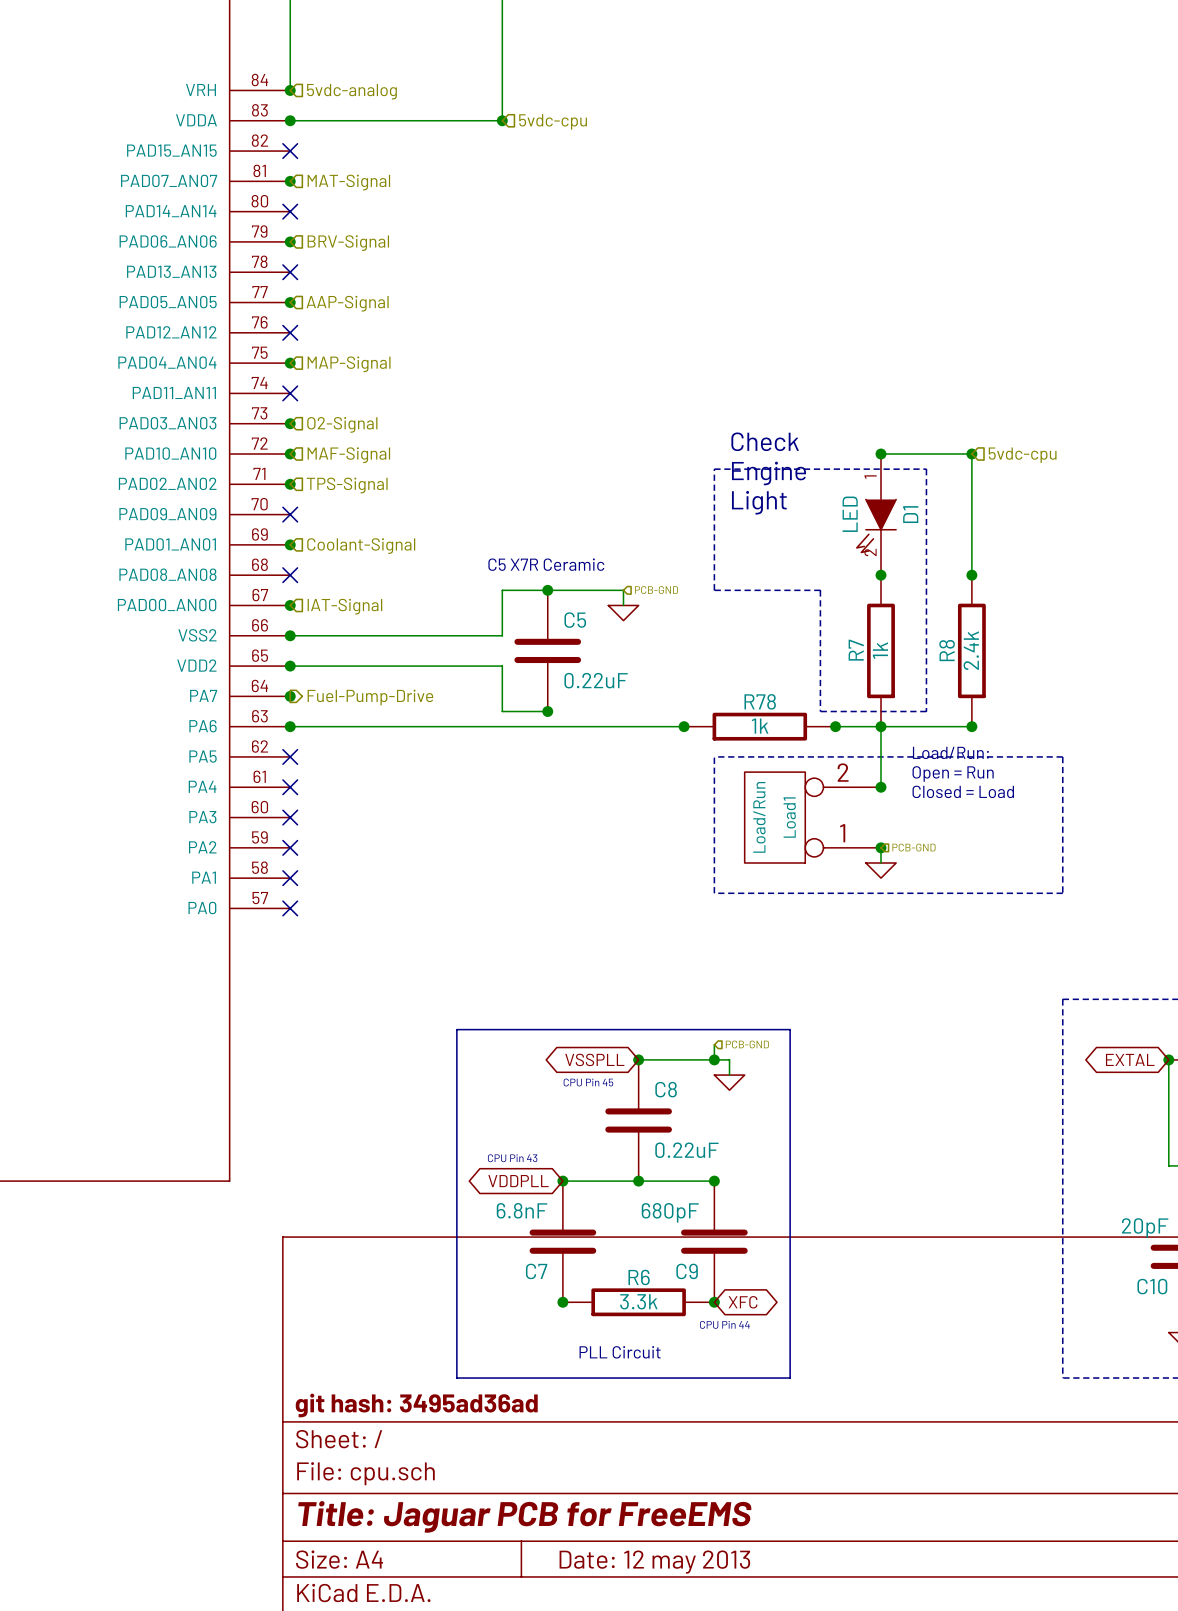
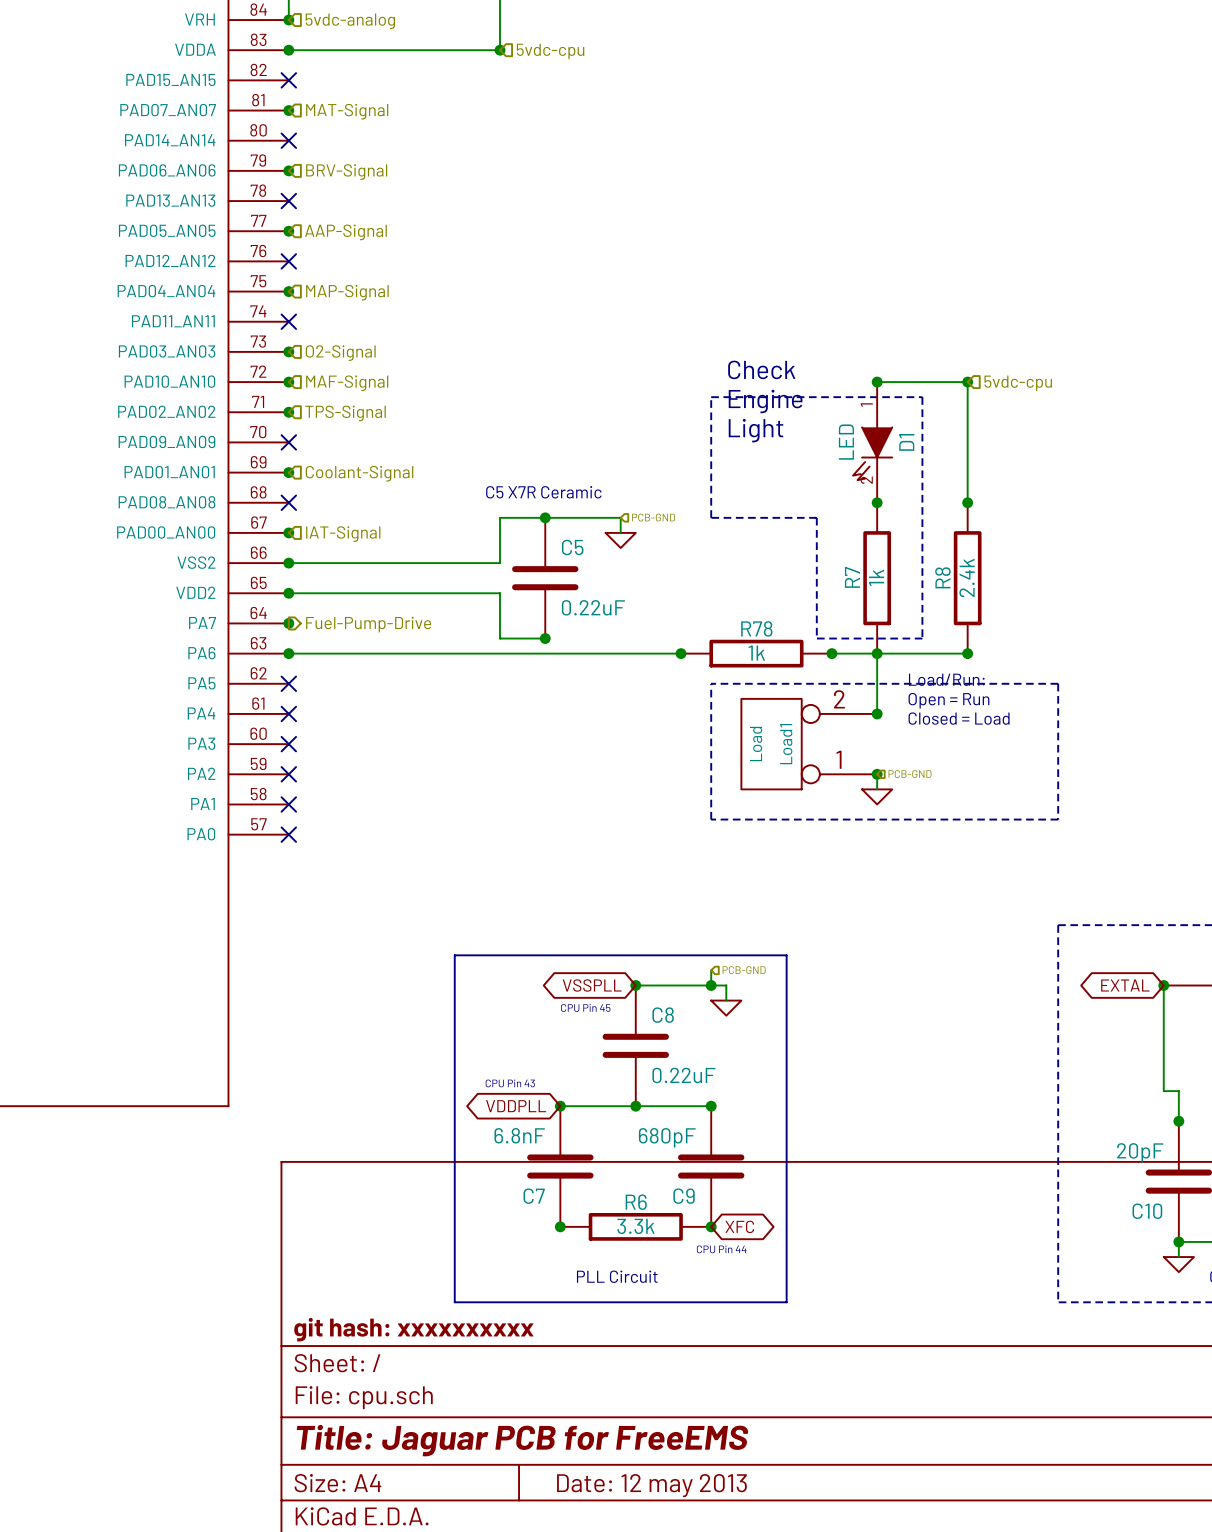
Load1 value: Load/Run (759, 817) -> Load (756, 744)
title block: git hash: 3495ad36ad (416, 1405) -> git hash: xxxxxxxxxx (413, 1329)

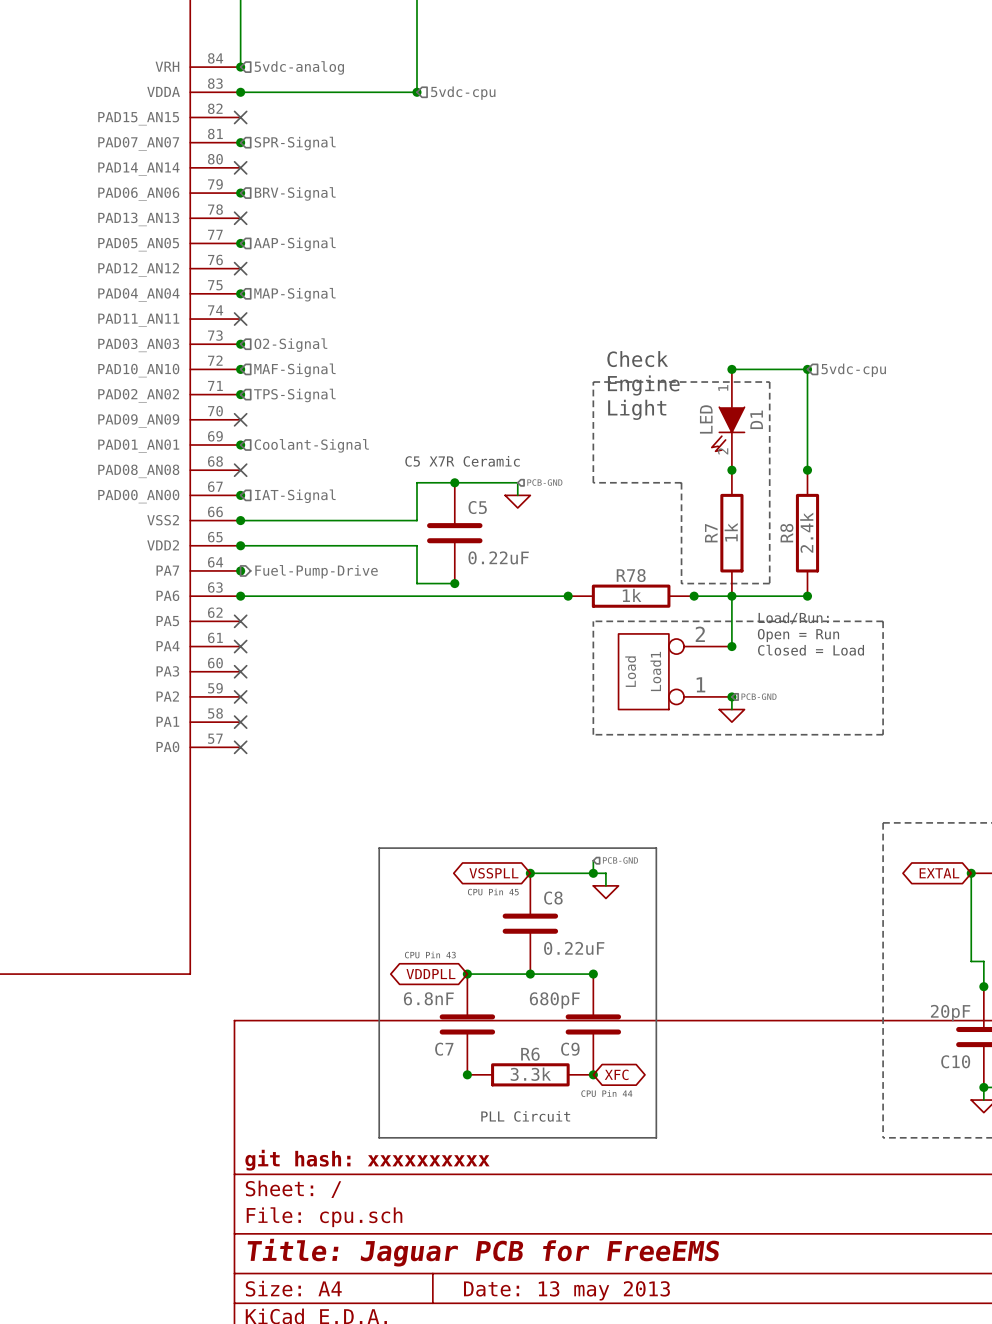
hierarchical label: MAT-Signal (347, 111) -> SPR-Signal (295, 143)
title block: Date: 12 may 2013 (651, 1485) -> Date: 13 may 2013 (566, 1290)

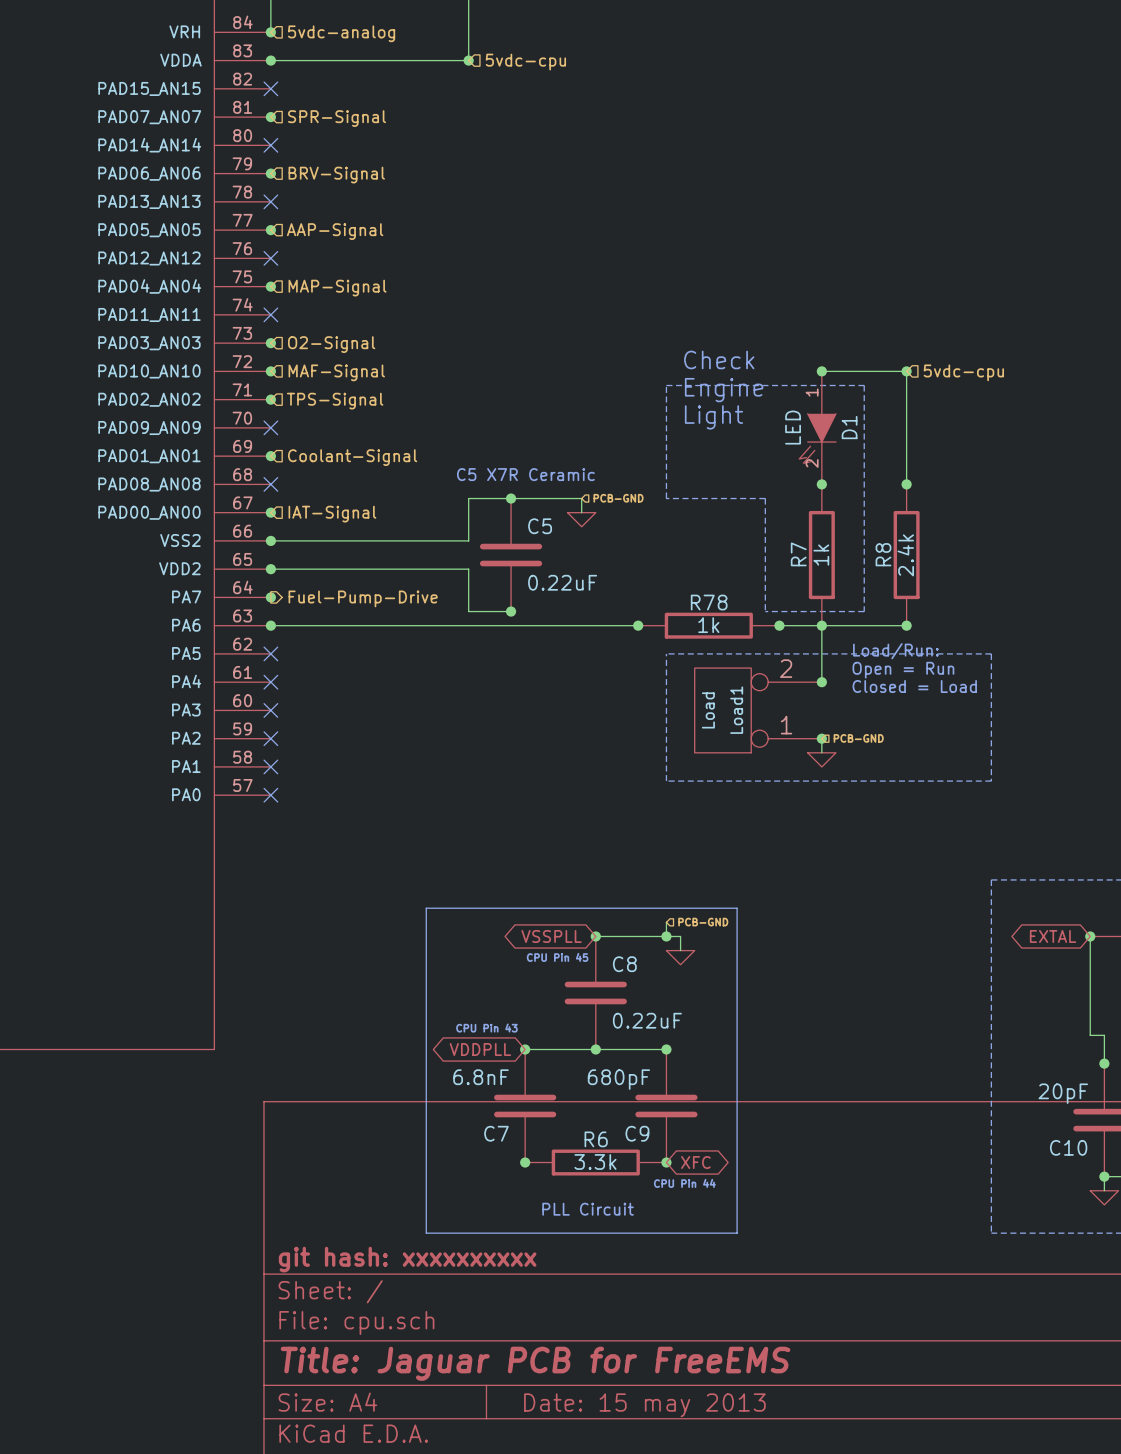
title block: Date: 13 may 2013 (566, 1290) -> Date: 15 may 2013 (644, 1405)

